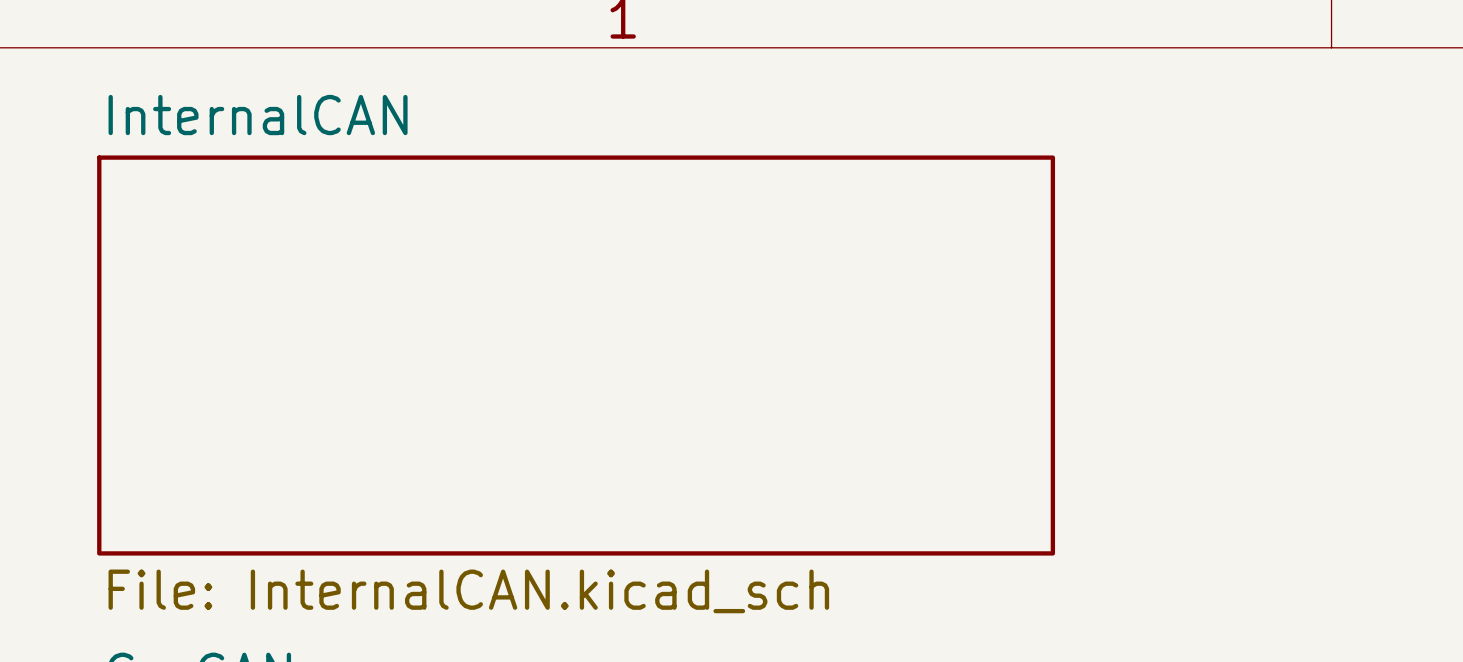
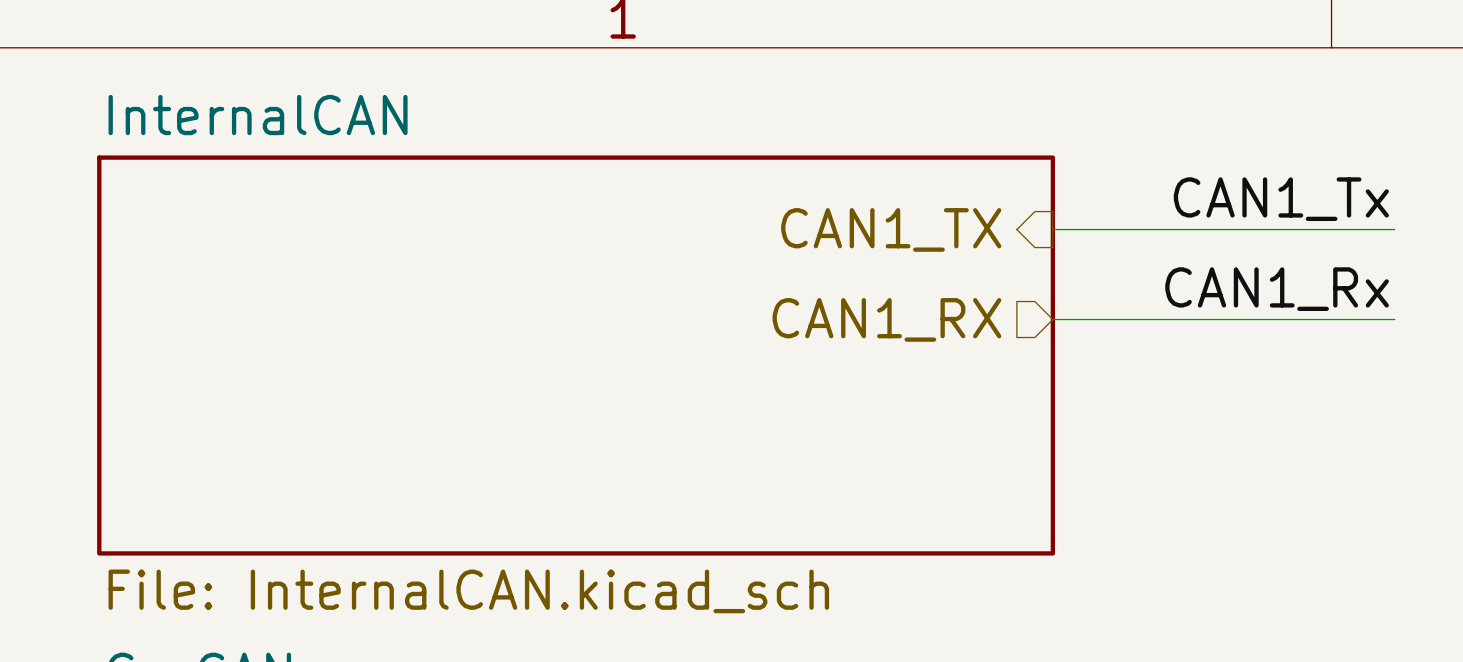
label: none -> CAN1_Tx (1281, 199)
hierarchical label: none -> CAN1_TX (891, 229)
wire: none -> (1052, 229) (1394, 229)
label: none -> CAN1_Rx (1277, 289)
hierarchical label: none -> CAN1_RX (886, 319)
wire: none -> (1052, 319) (1394, 319)

